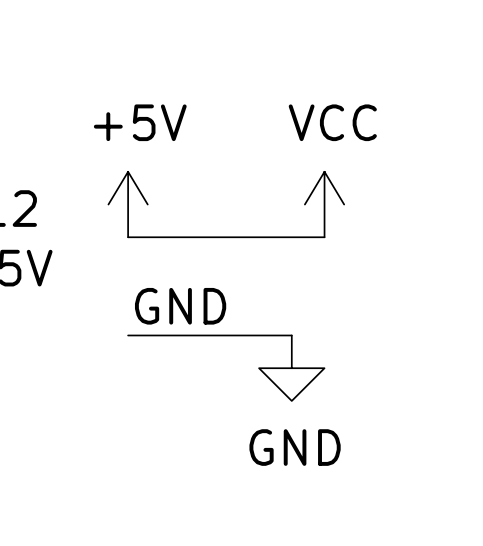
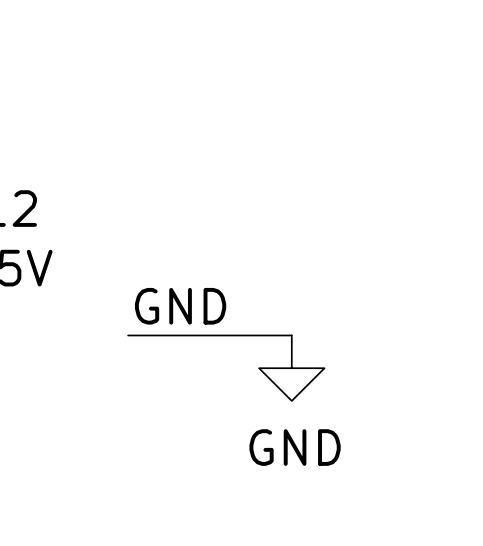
power symbol: +5V (128, 204) -> none
power symbol: VCC (324, 204) -> none
wire: (128, 237) (324, 237) -> none

